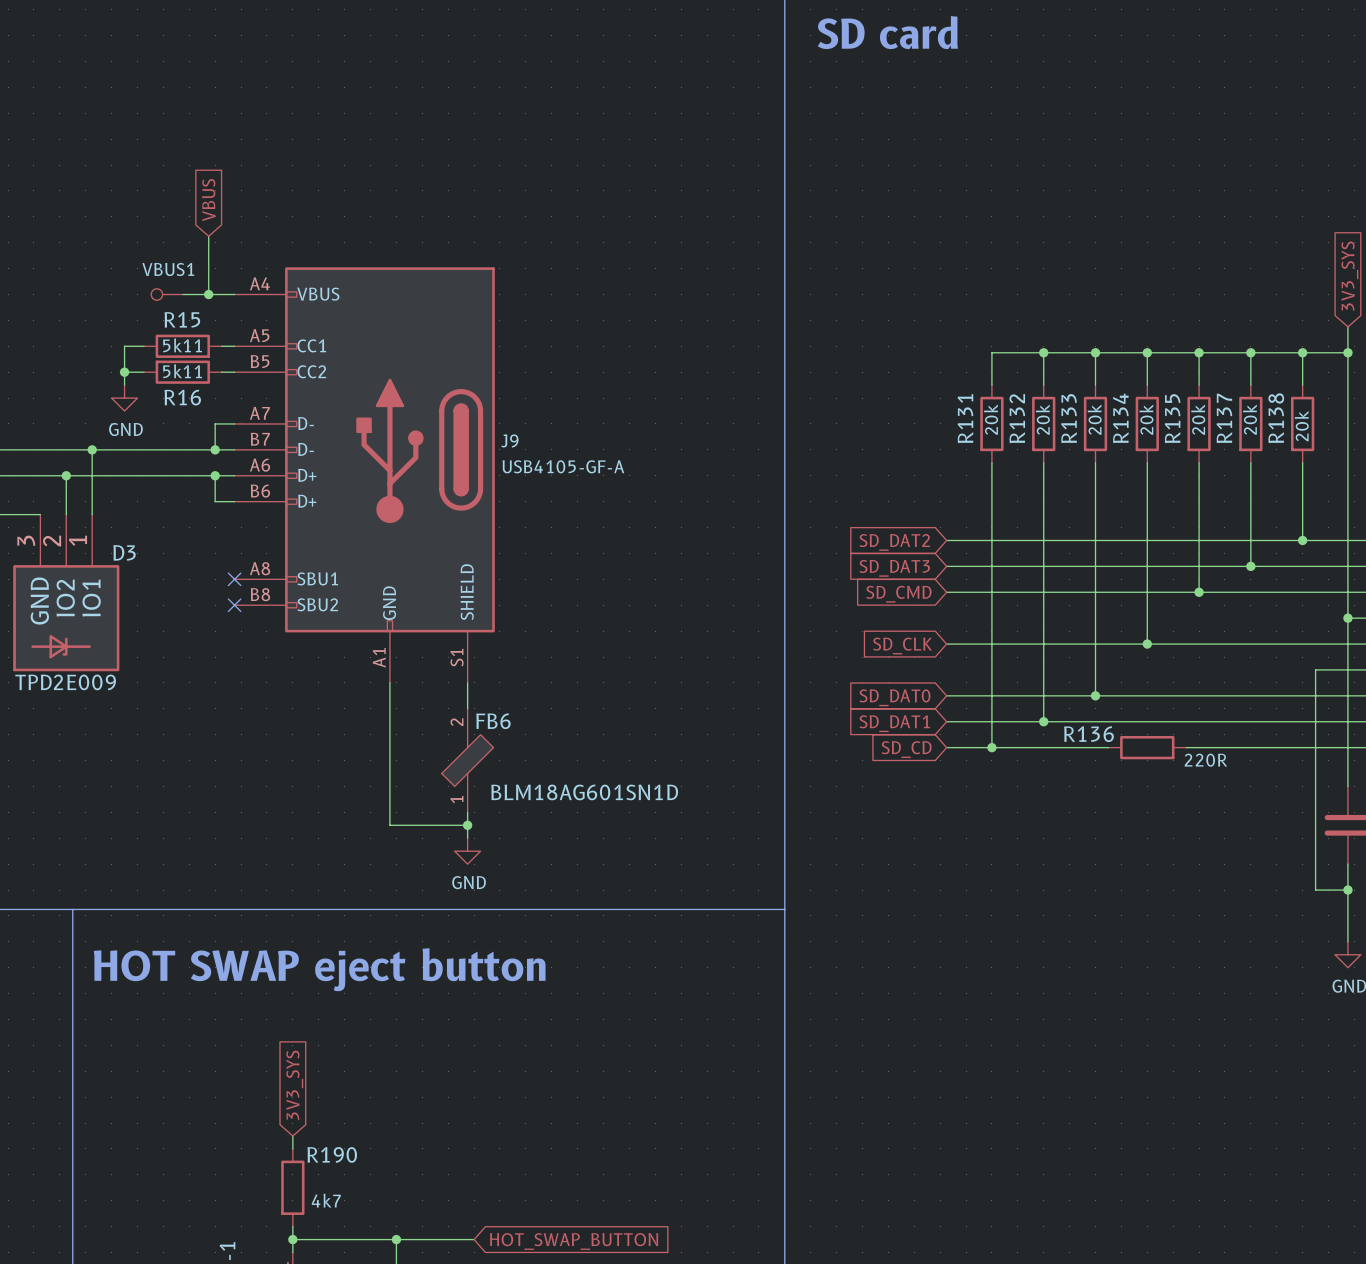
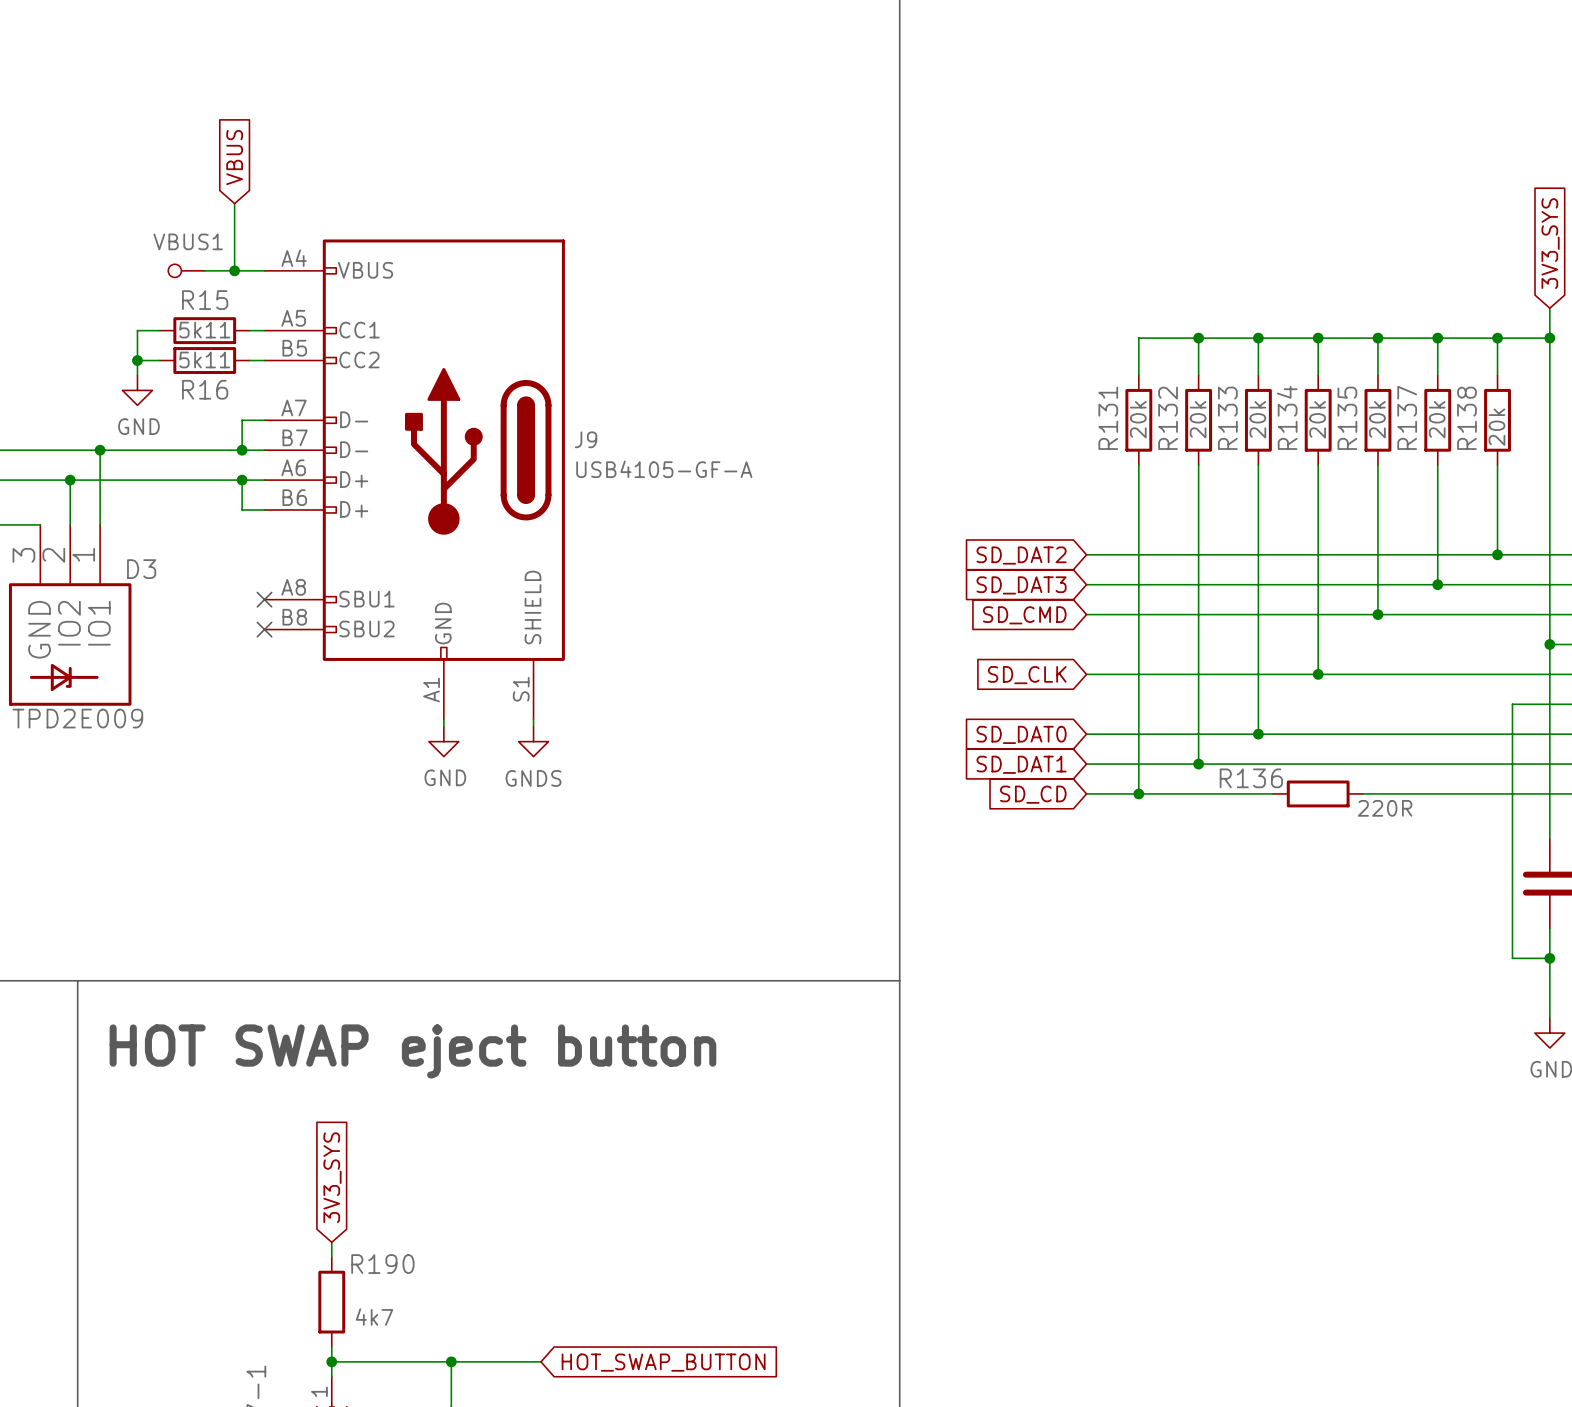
wire: (389, 689) (389, 825) (467, 825) -> none
power symbol: none -> GNDS (533, 741)
FB6: BLM18AG601SN1D (467, 760) -> none
wire: (467, 812) (467, 838) -> none
junction: (467, 825) -> none
power symbol position: GND (467, 851) -> GND (443, 741)

